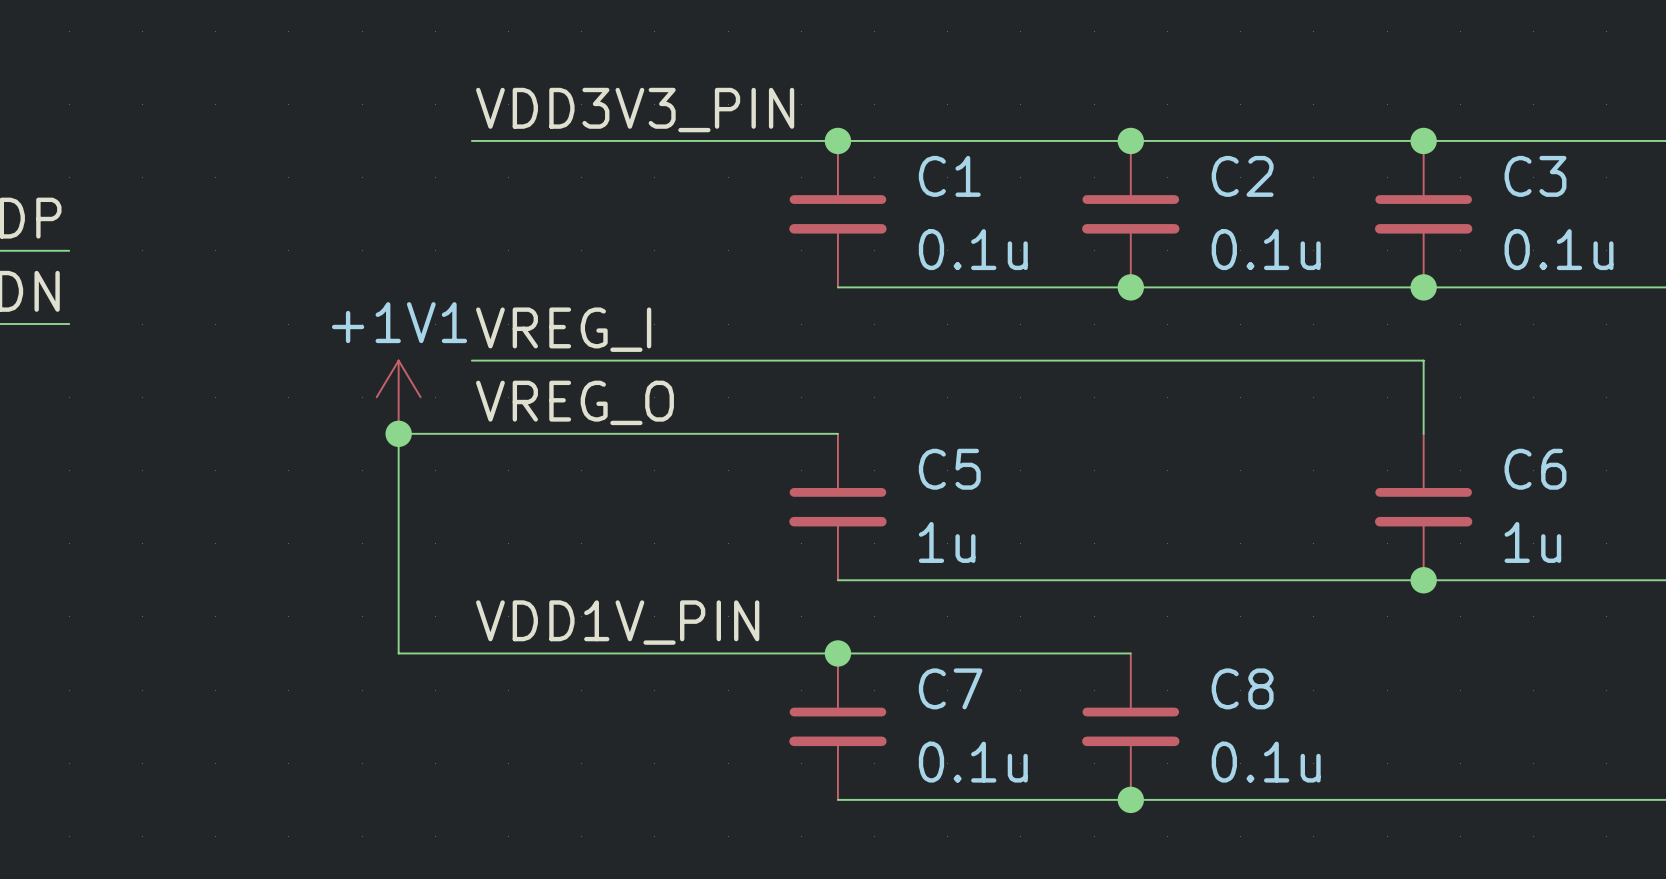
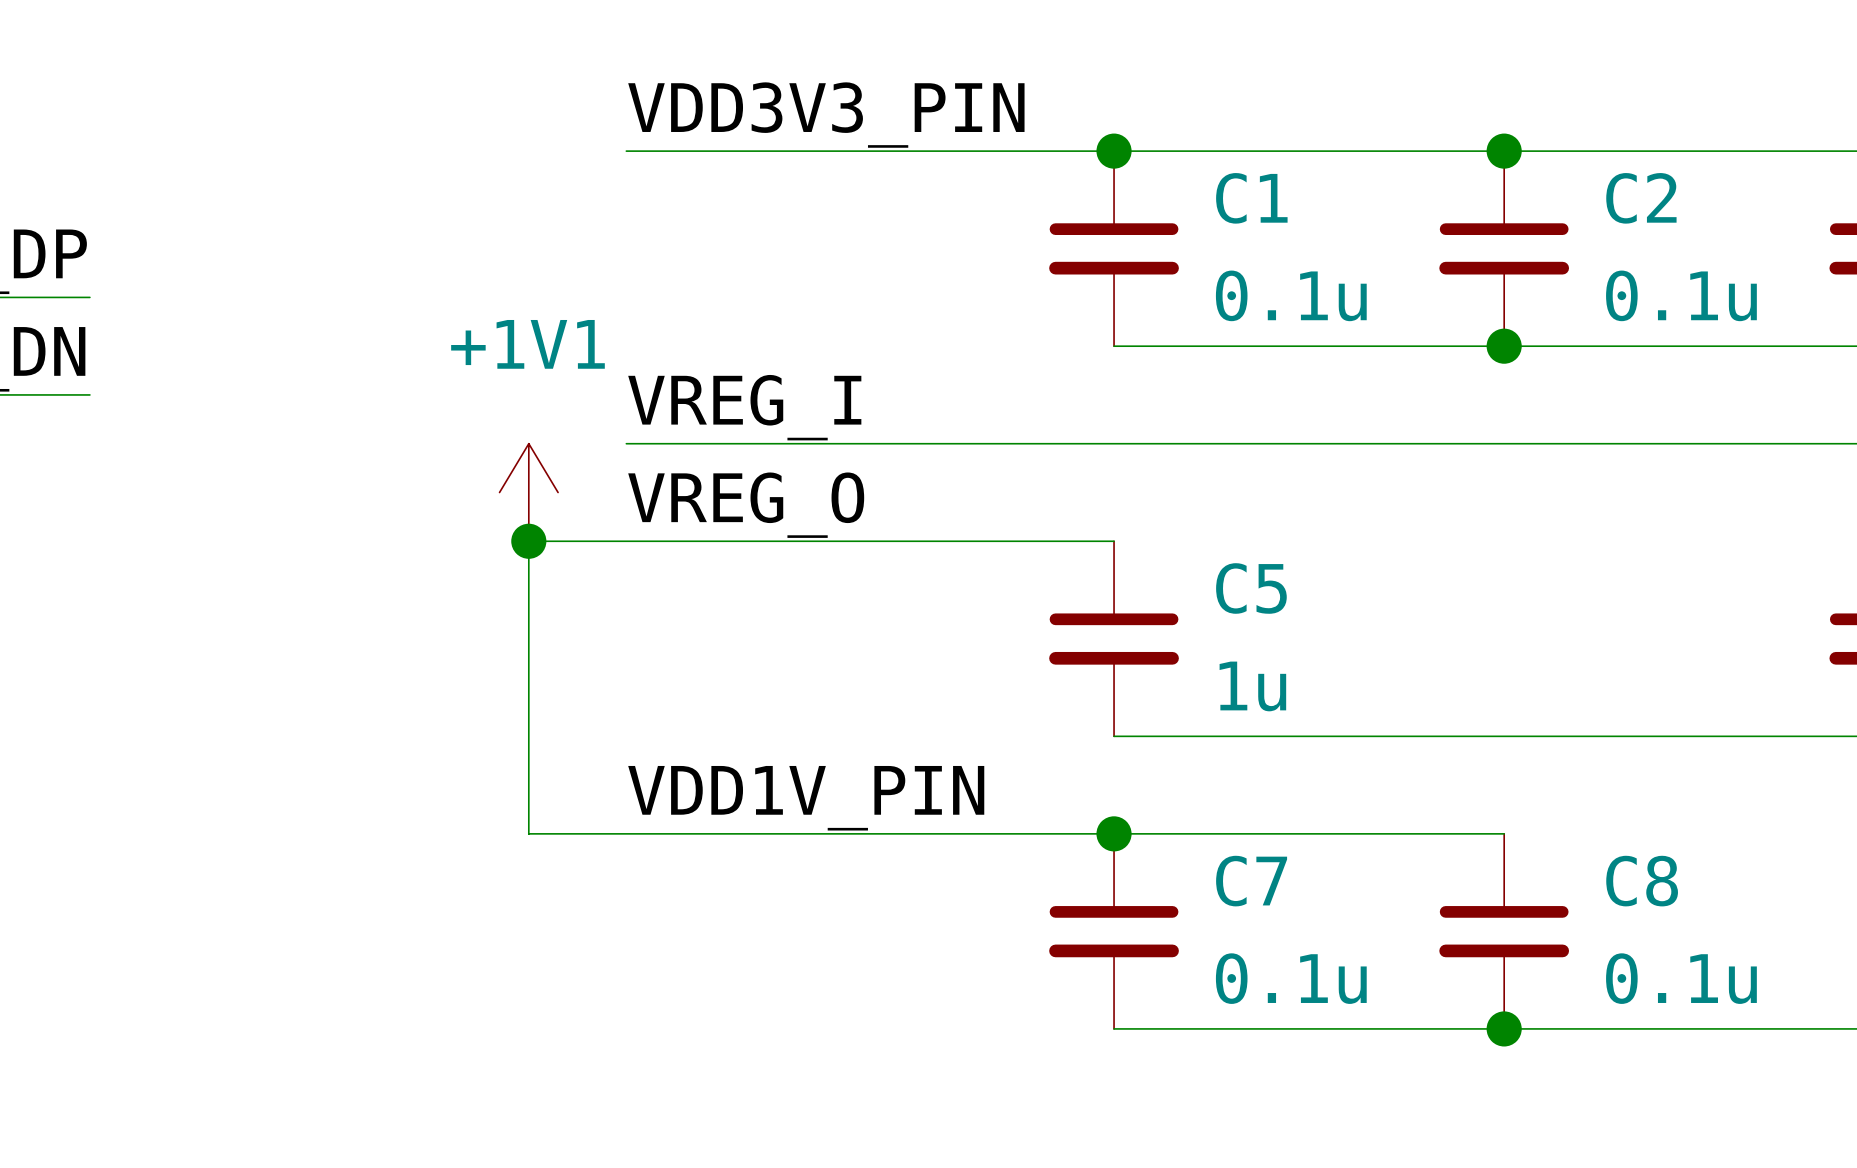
power symbol text position: +1V1 (399, 322) -> +1V1 (527, 344)

